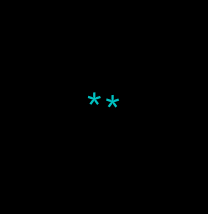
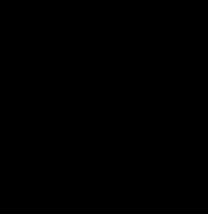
part: (103, 99) -> none

